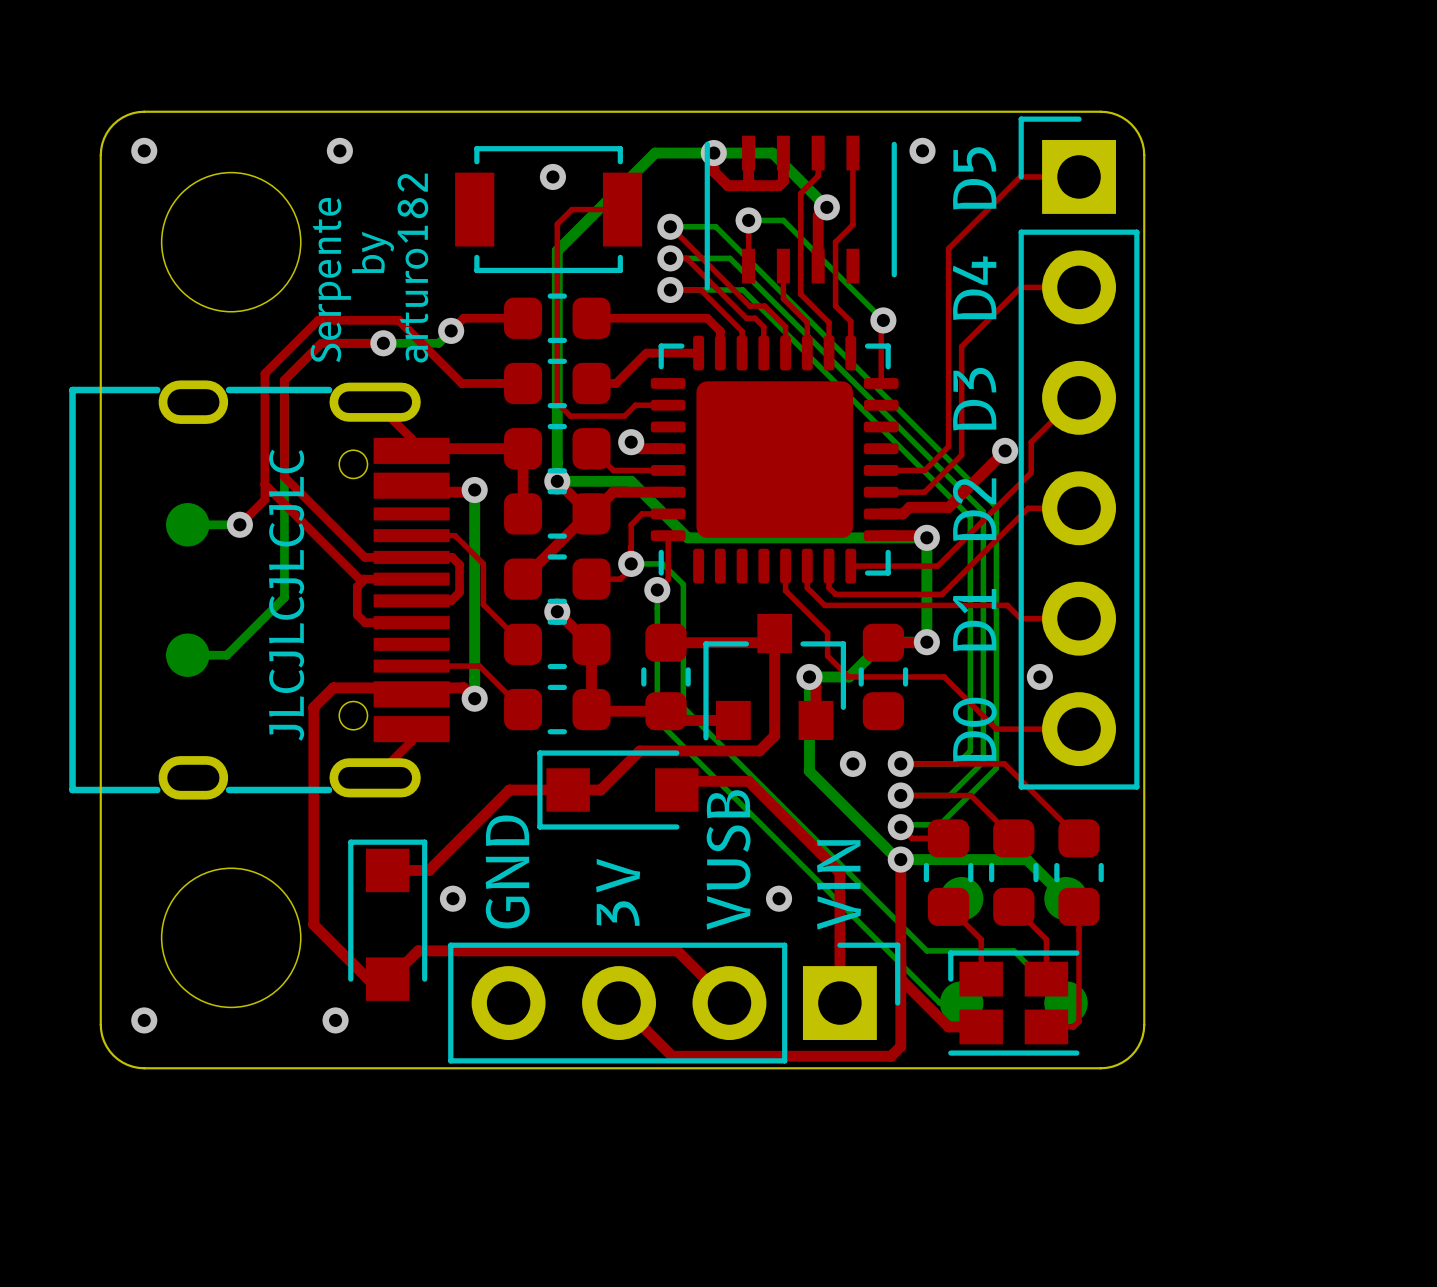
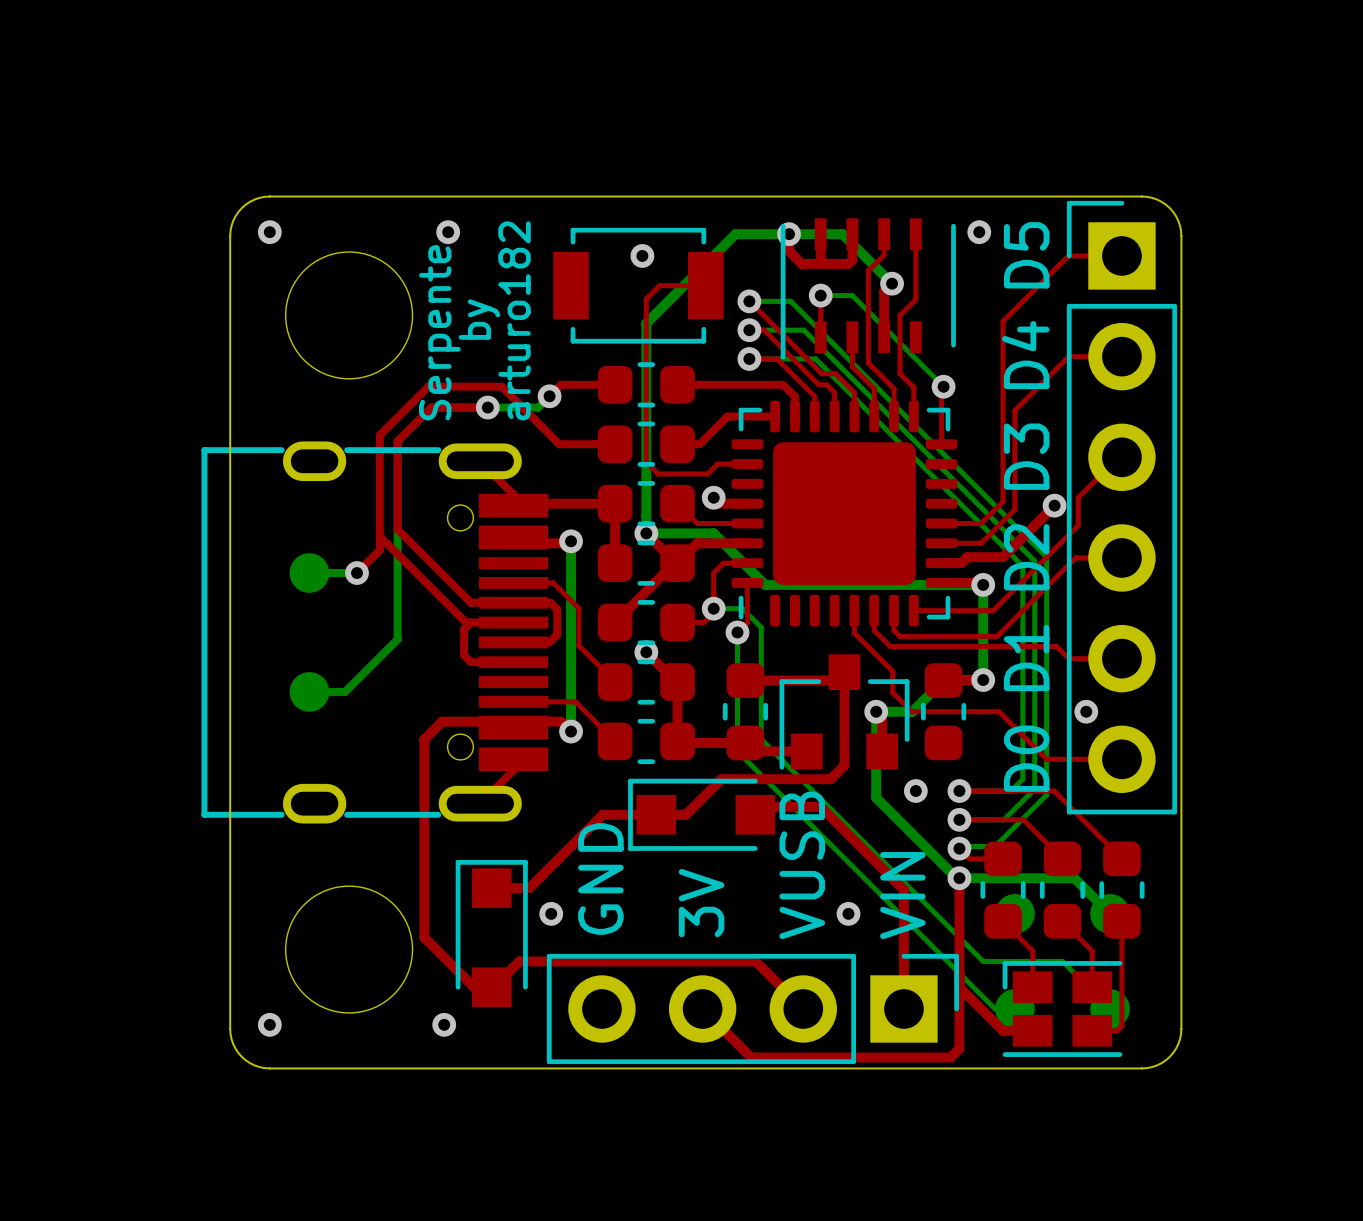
text: JLCJLCJLCJLC (286, 595) -> none

